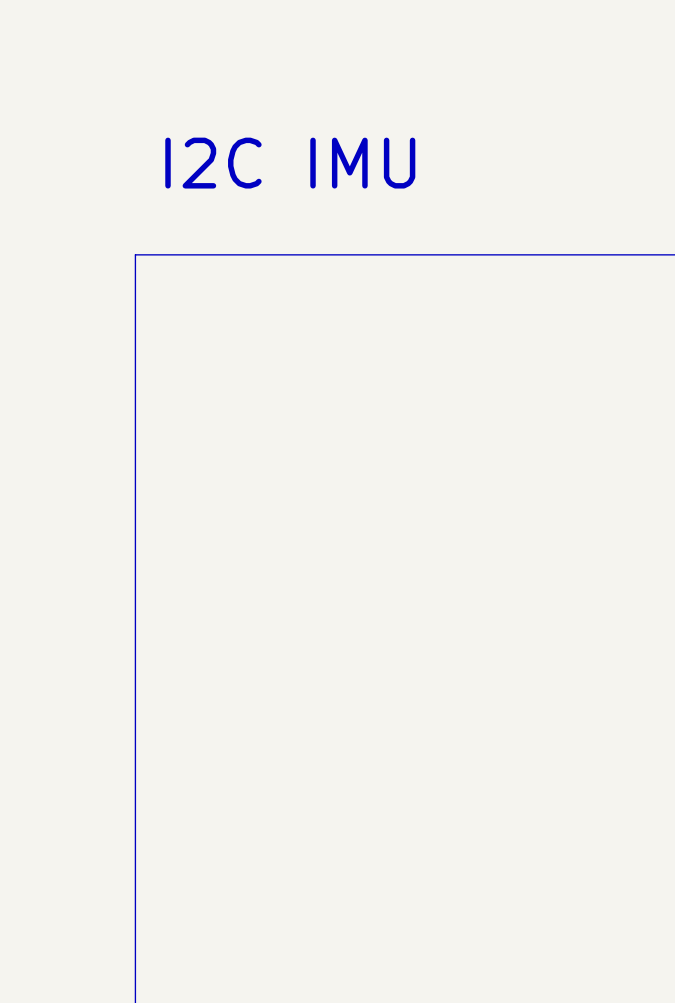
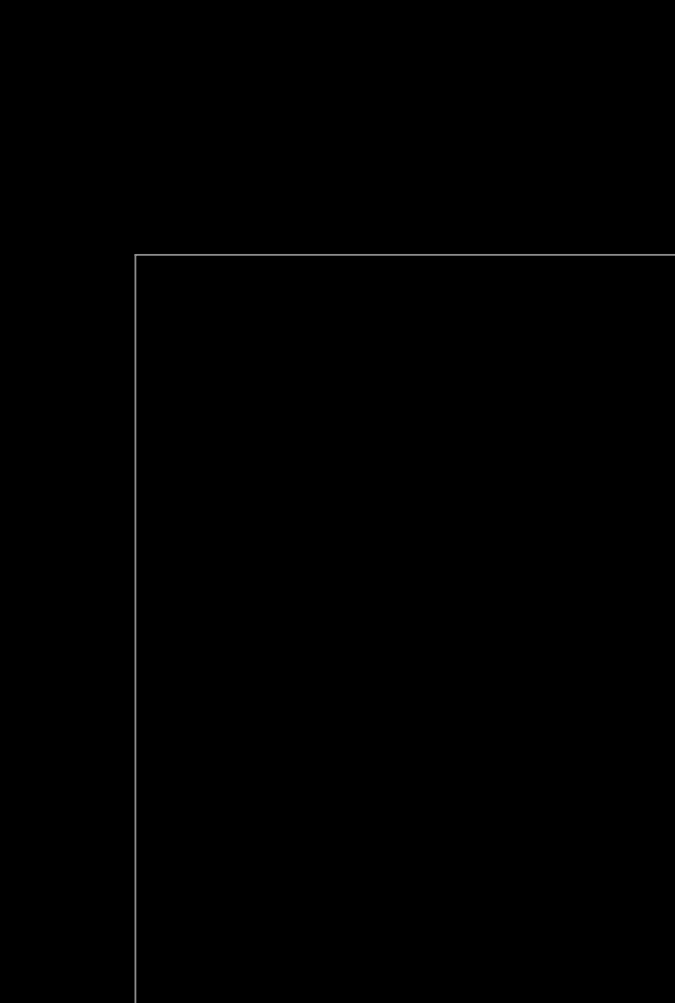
text: I2C IMU (290, 163) -> none

